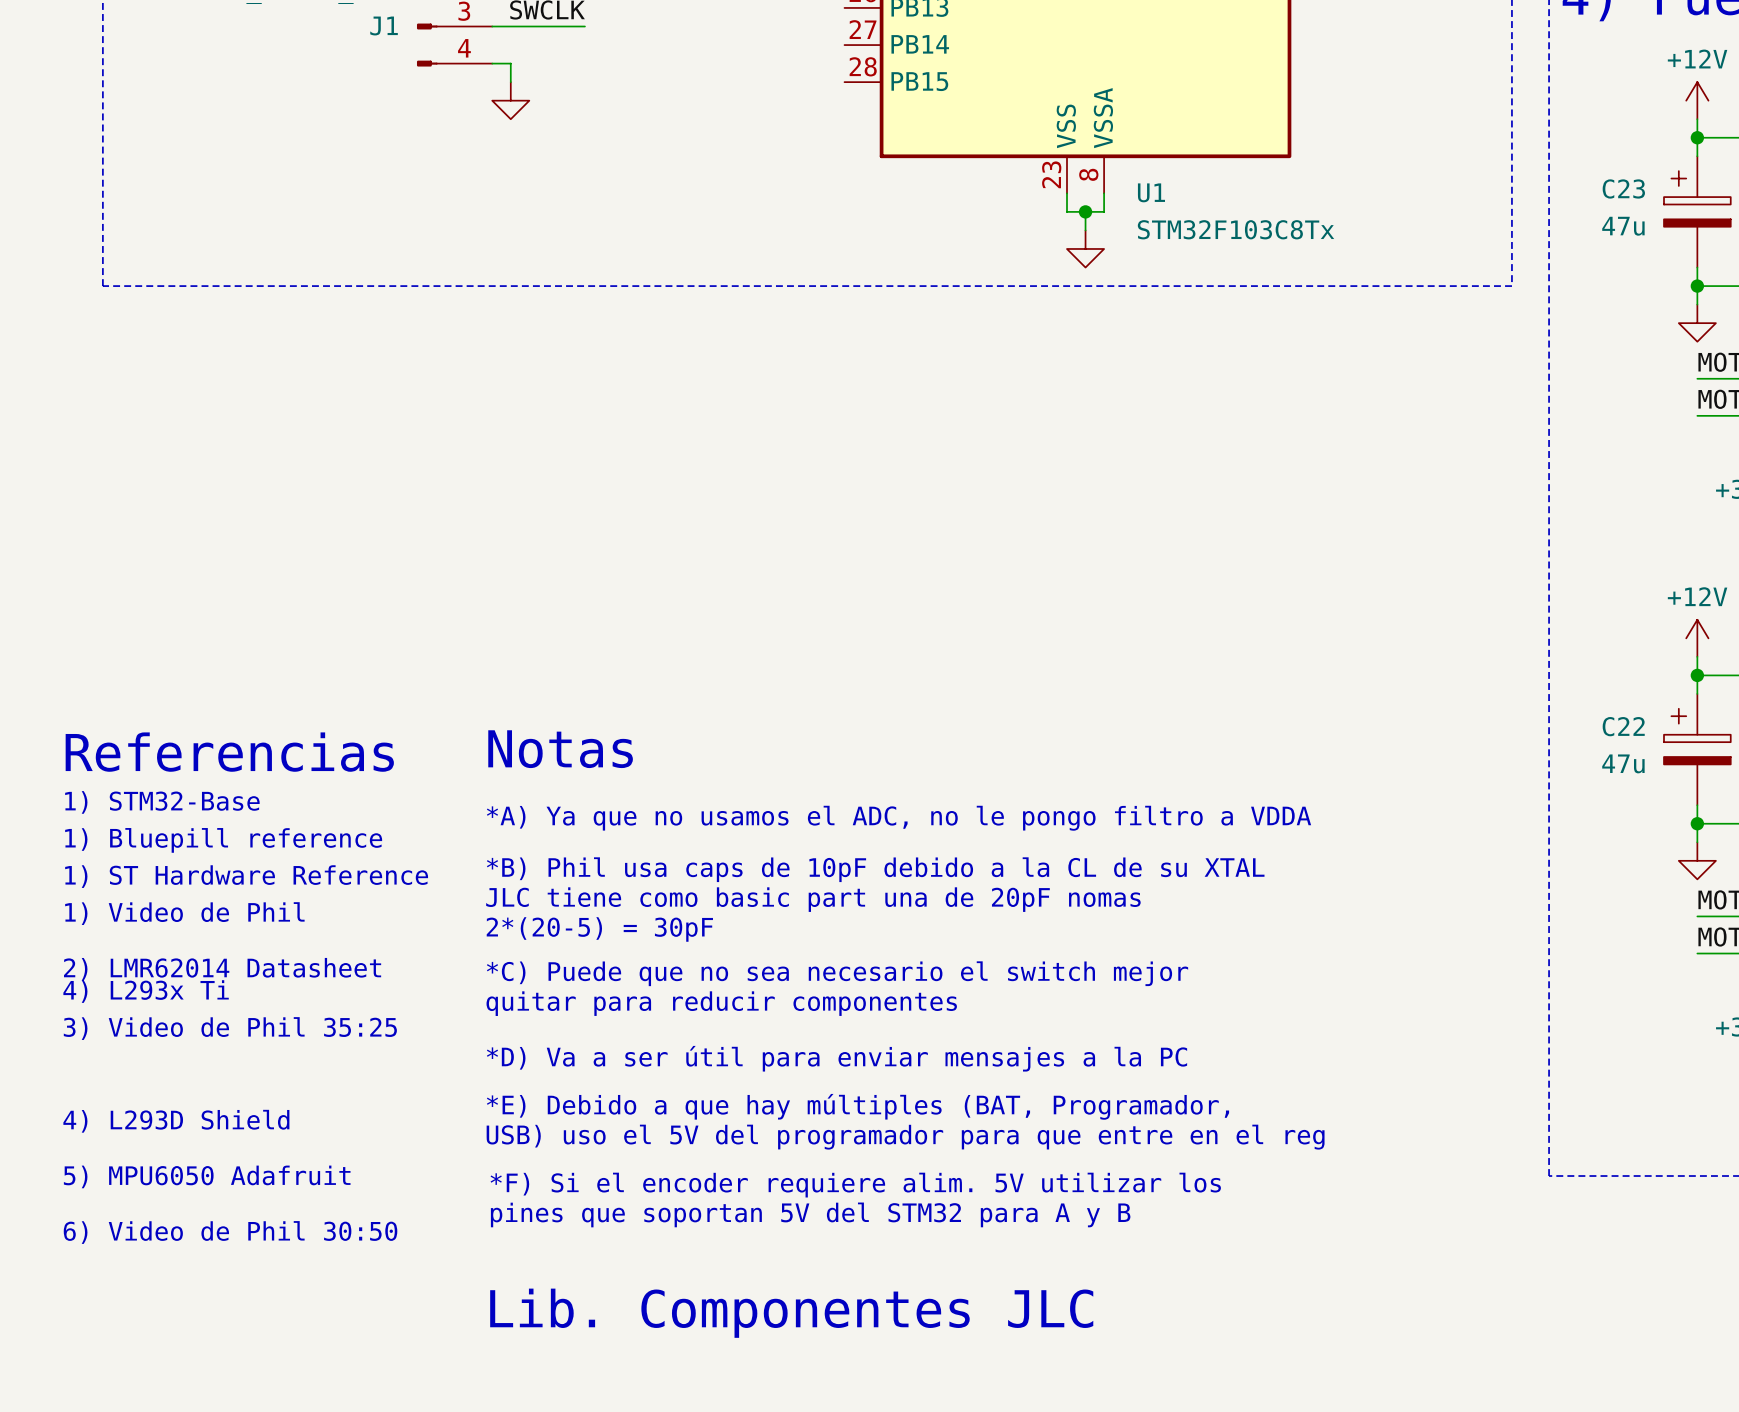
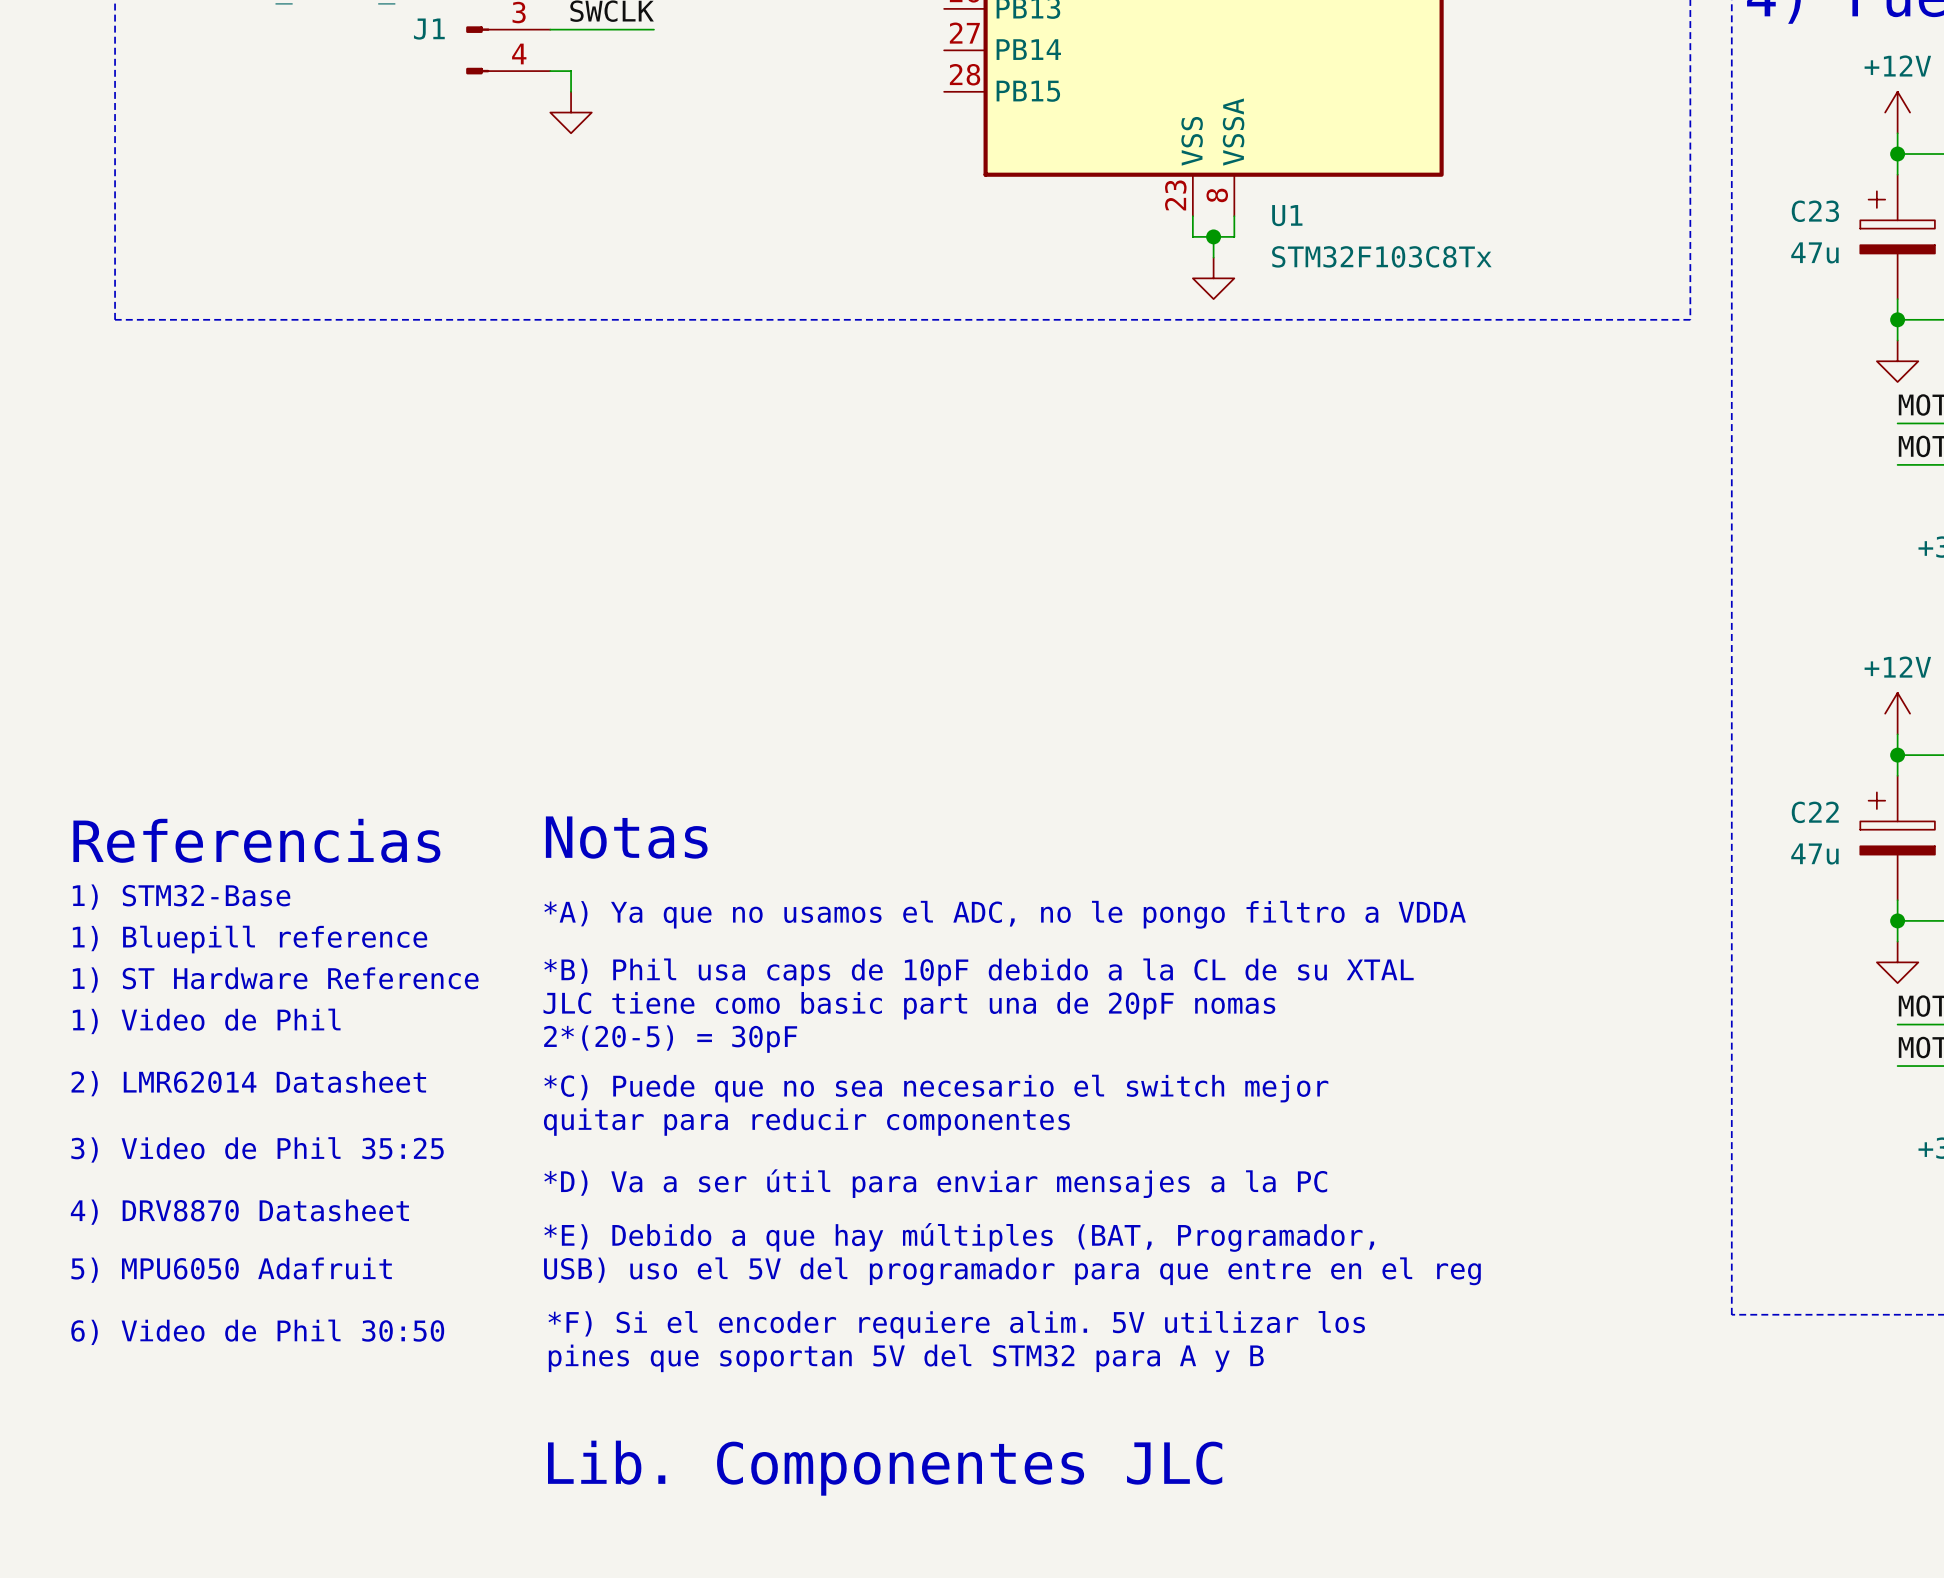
text: 4) L293x Ti (146, 991) -> none
text: none -> 4) DRV8870 Datasheet (239, 1212)
text: 4) L293D Shield (176, 1121) -> none
text position: 5) MPU6050 Adafruit (207, 1176) -> 5) MPU6050 Adafruit (231, 1270)
text position: 6) Video de Phil 30:50 (230, 1232) -> 6) Video de Phil 30:50 (257, 1332)

